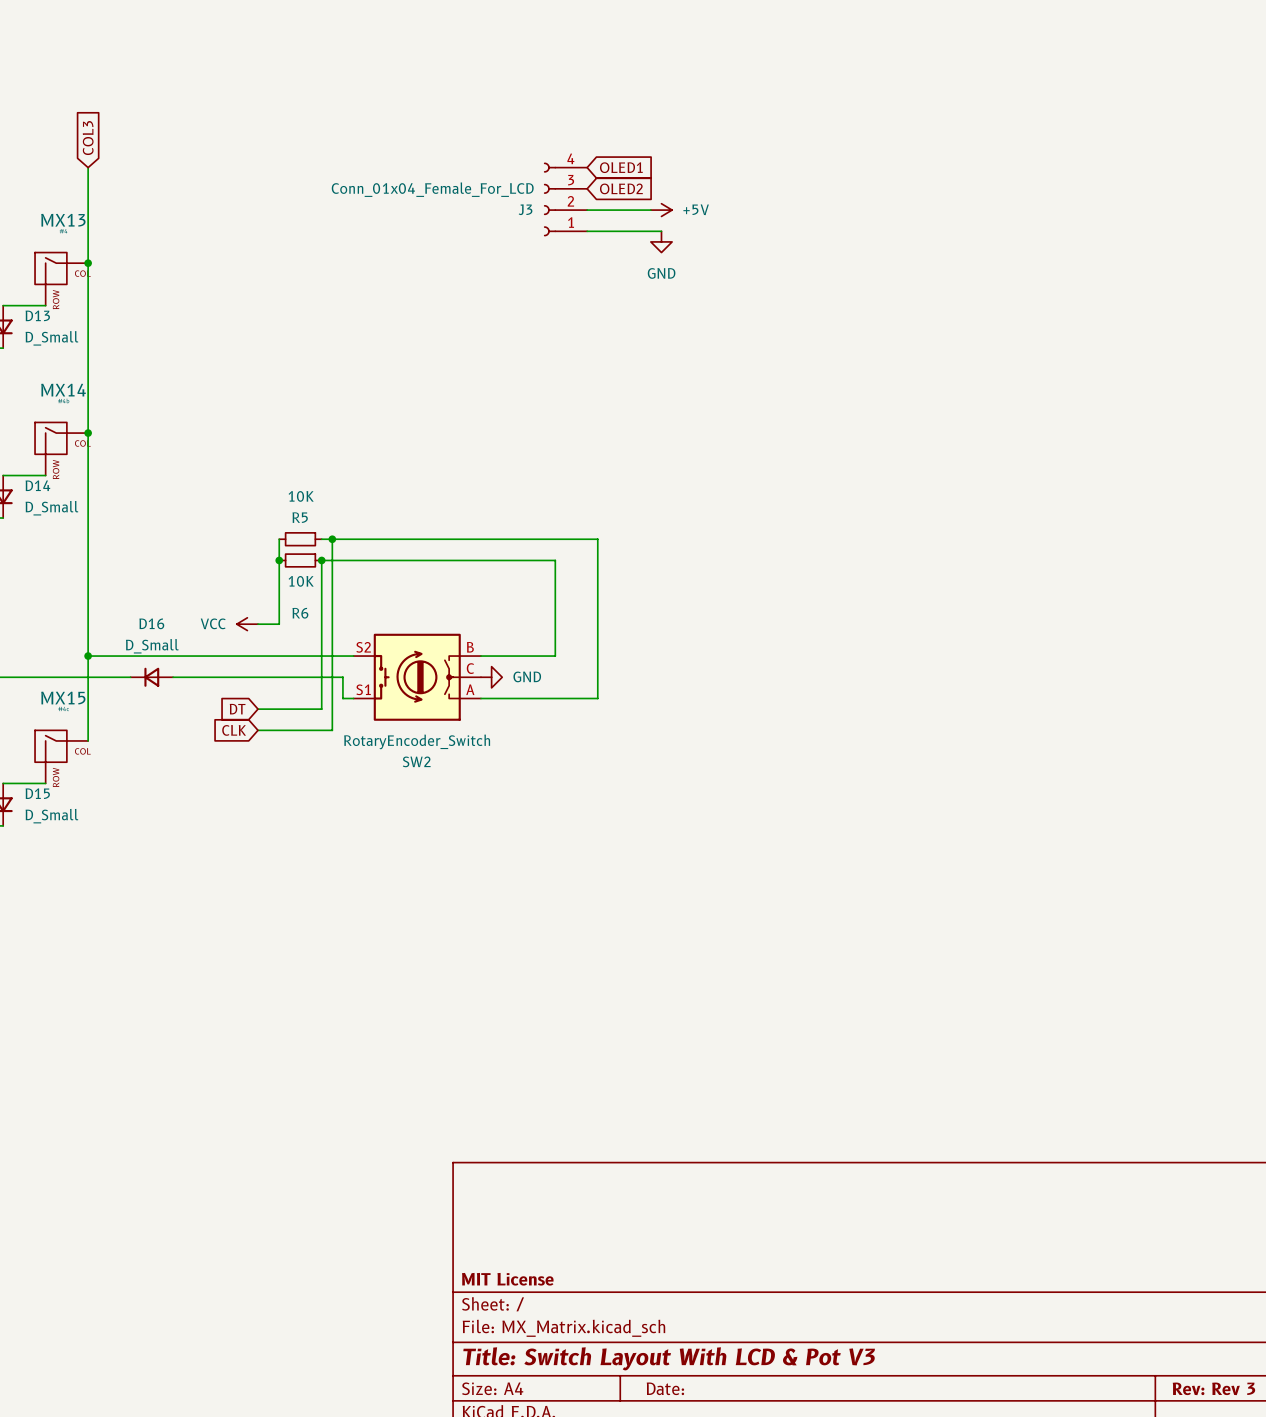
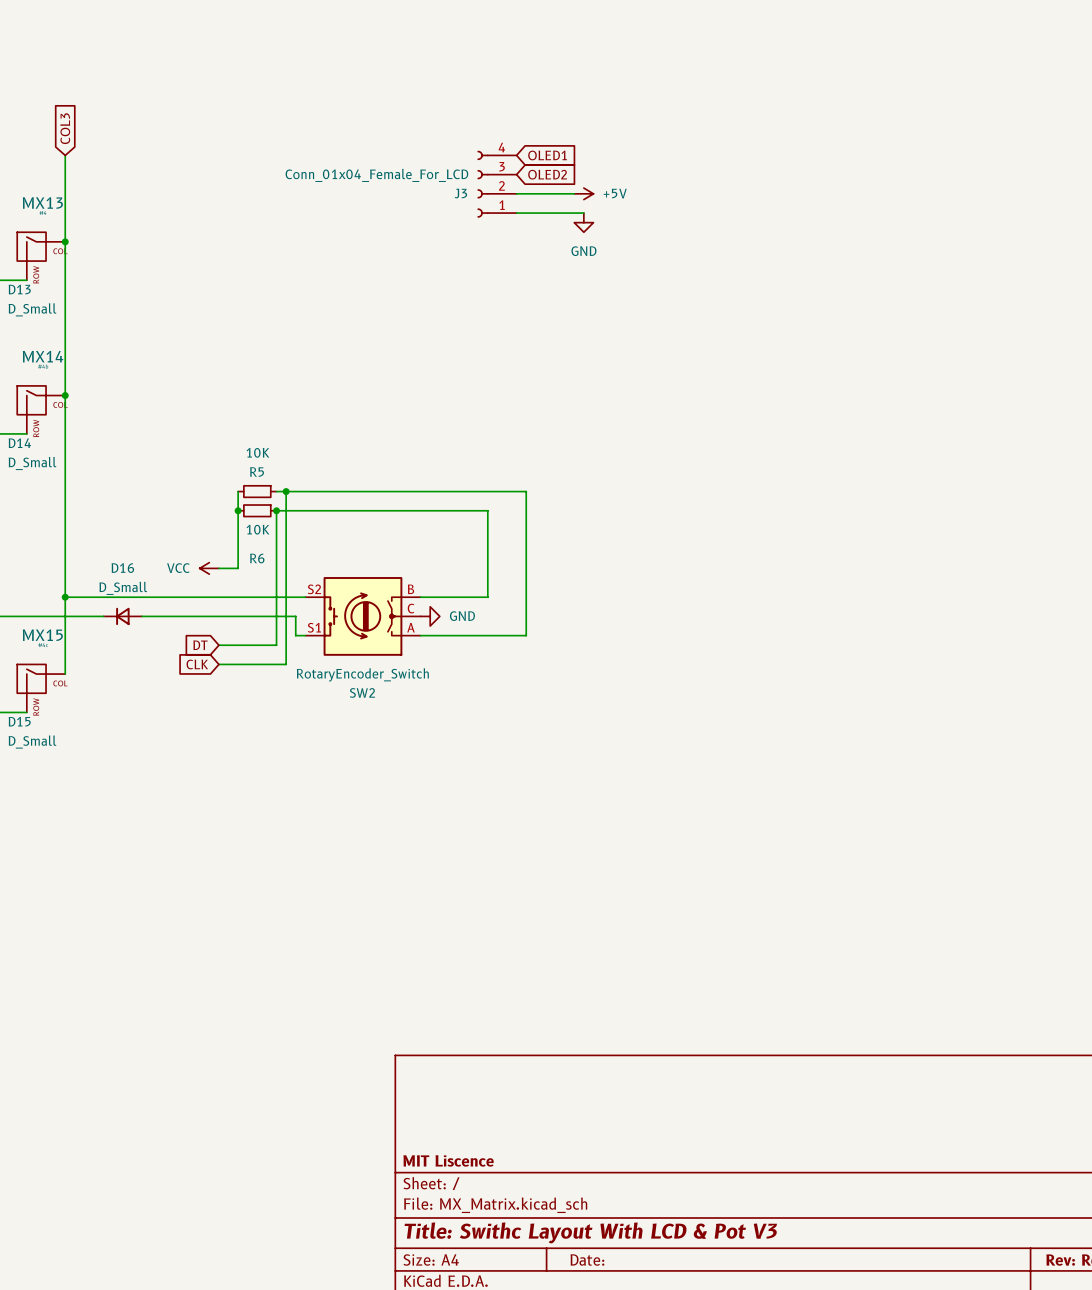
title block: MIT License (507, 1279) -> MIT Liscence (448, 1160)
title block: Title: Switch Layout With LCD & Pot V3 (669, 1358) -> Title: Swithc Layout With LCD & Pot V3 (590, 1232)

